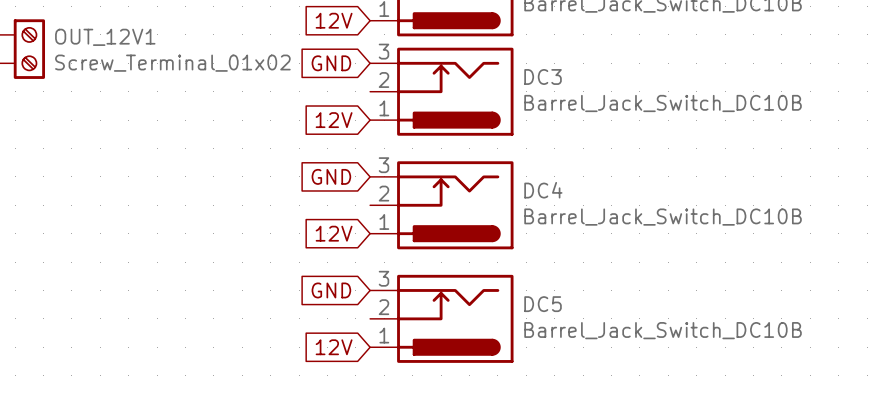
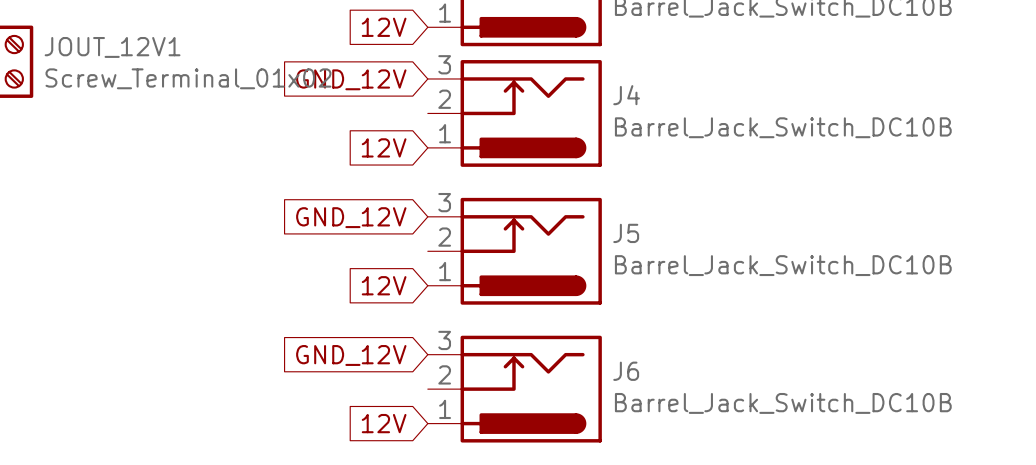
OUT_12V1 name: OUT_12V1 (105, 37) -> JOUT_12V1 (112, 47)
global label: GND (331, 63) -> GND_12V (351, 79)
DC3 name: DC3 (543, 76) -> J4 (626, 95)
global label: GND (331, 176) -> GND_12V (351, 217)
DC4 name: DC4 (543, 190) -> J5 (626, 233)
global label: GND (331, 290) -> GND_12V (351, 355)
DC5 name: DC5 (543, 304) -> J6 (626, 371)

